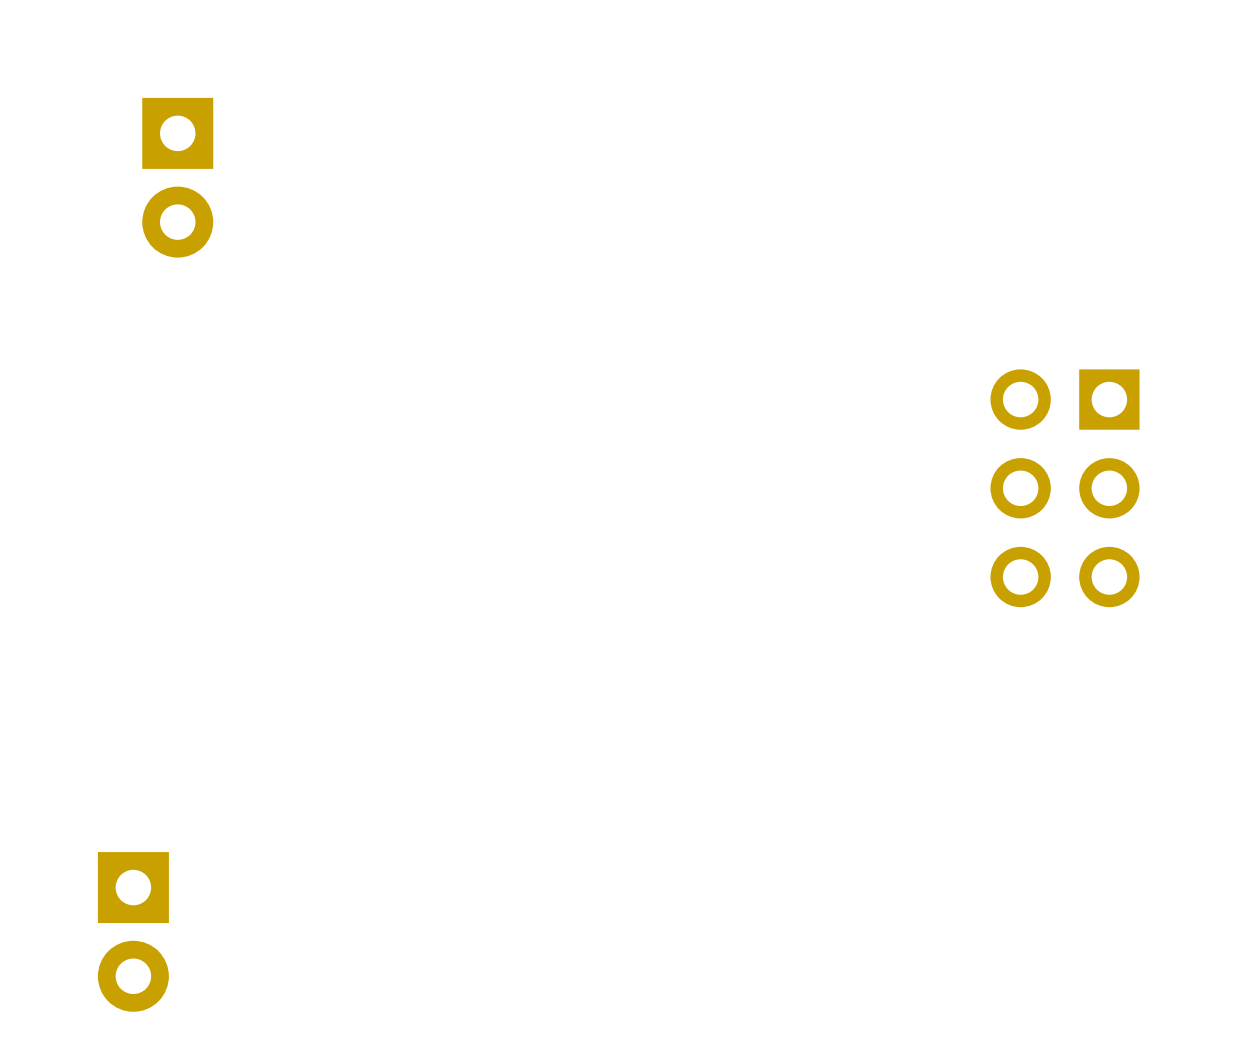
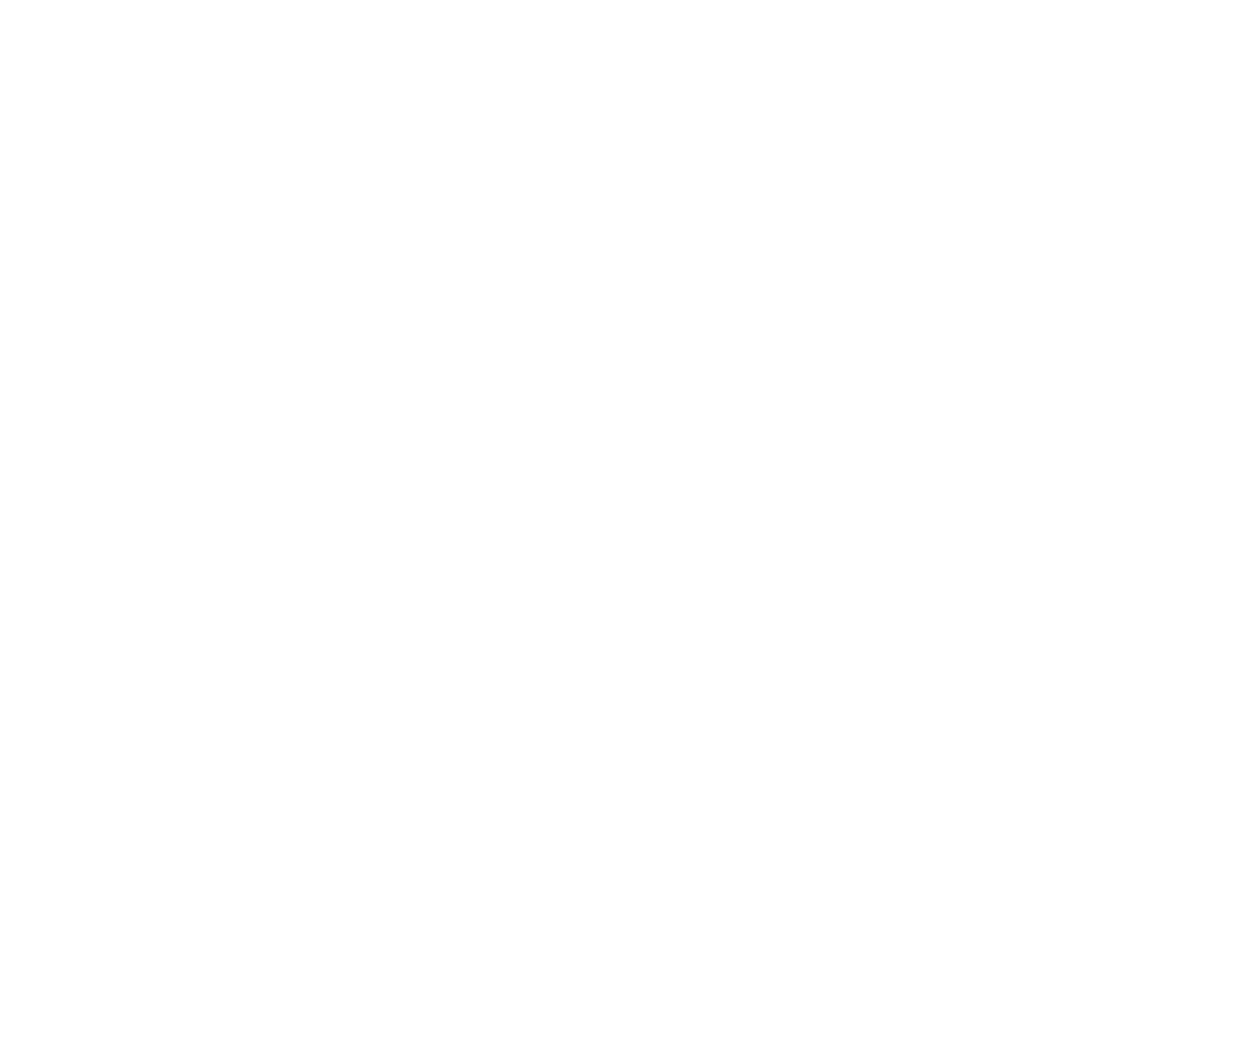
part: (177, 177) -> none
part: (1065, 488) -> none
part: (133, 931) -> none

